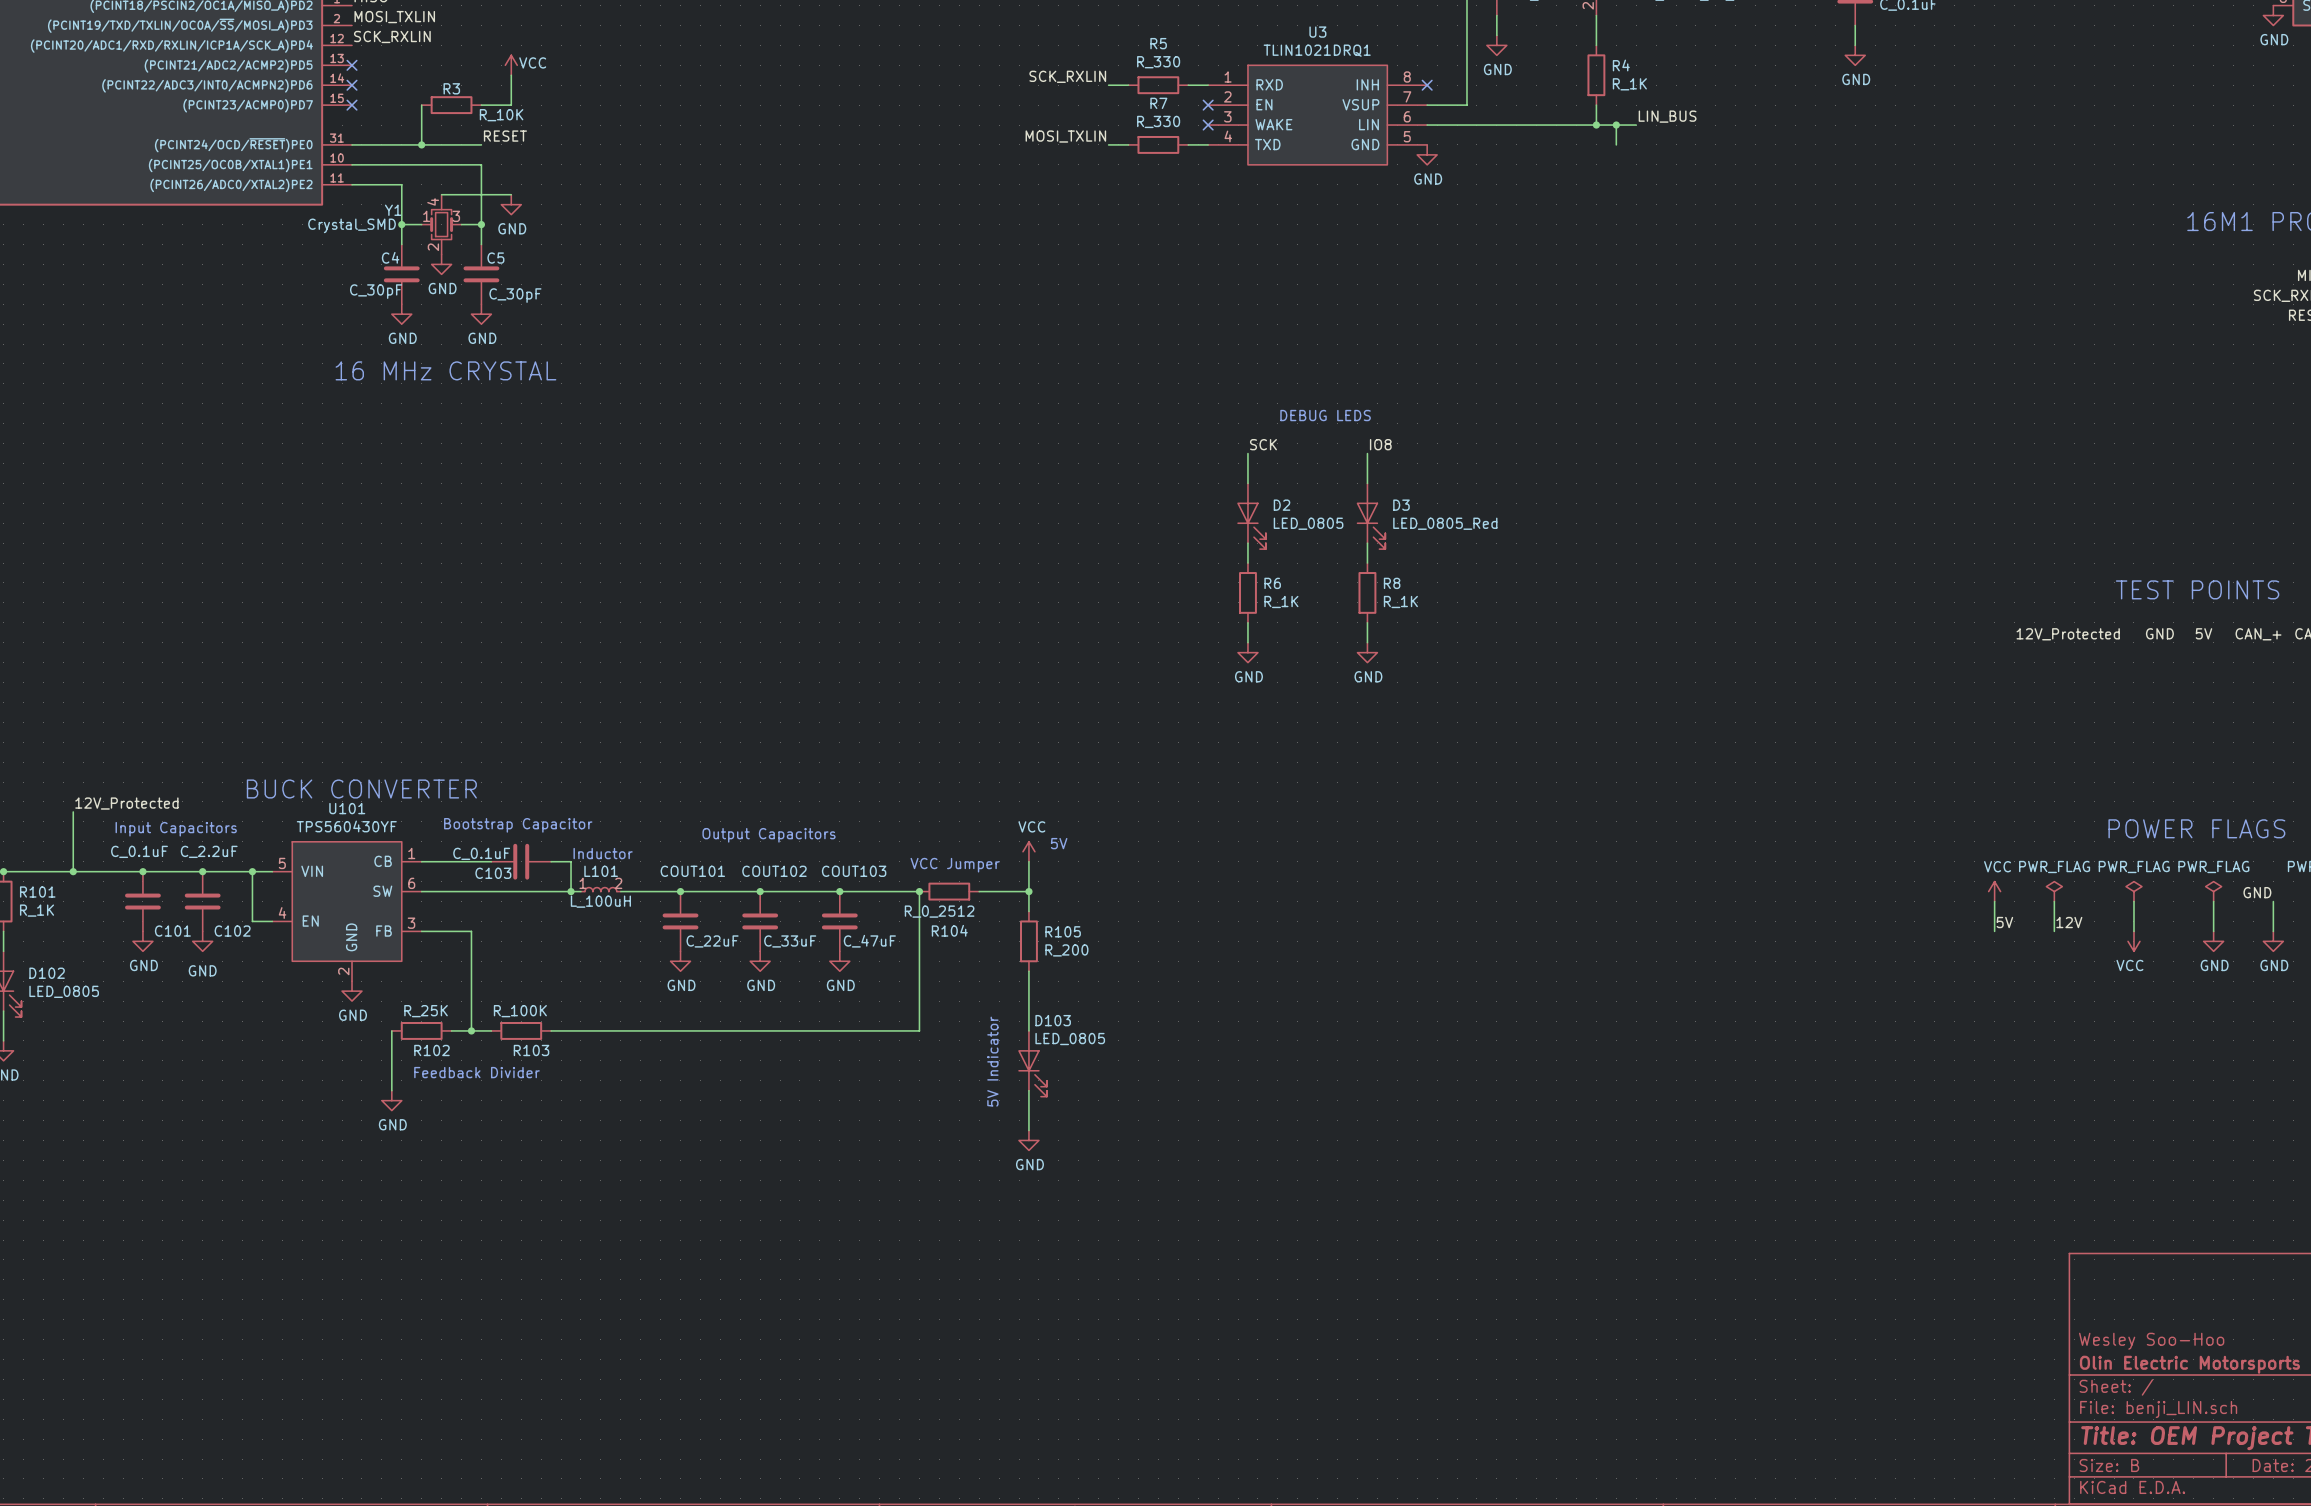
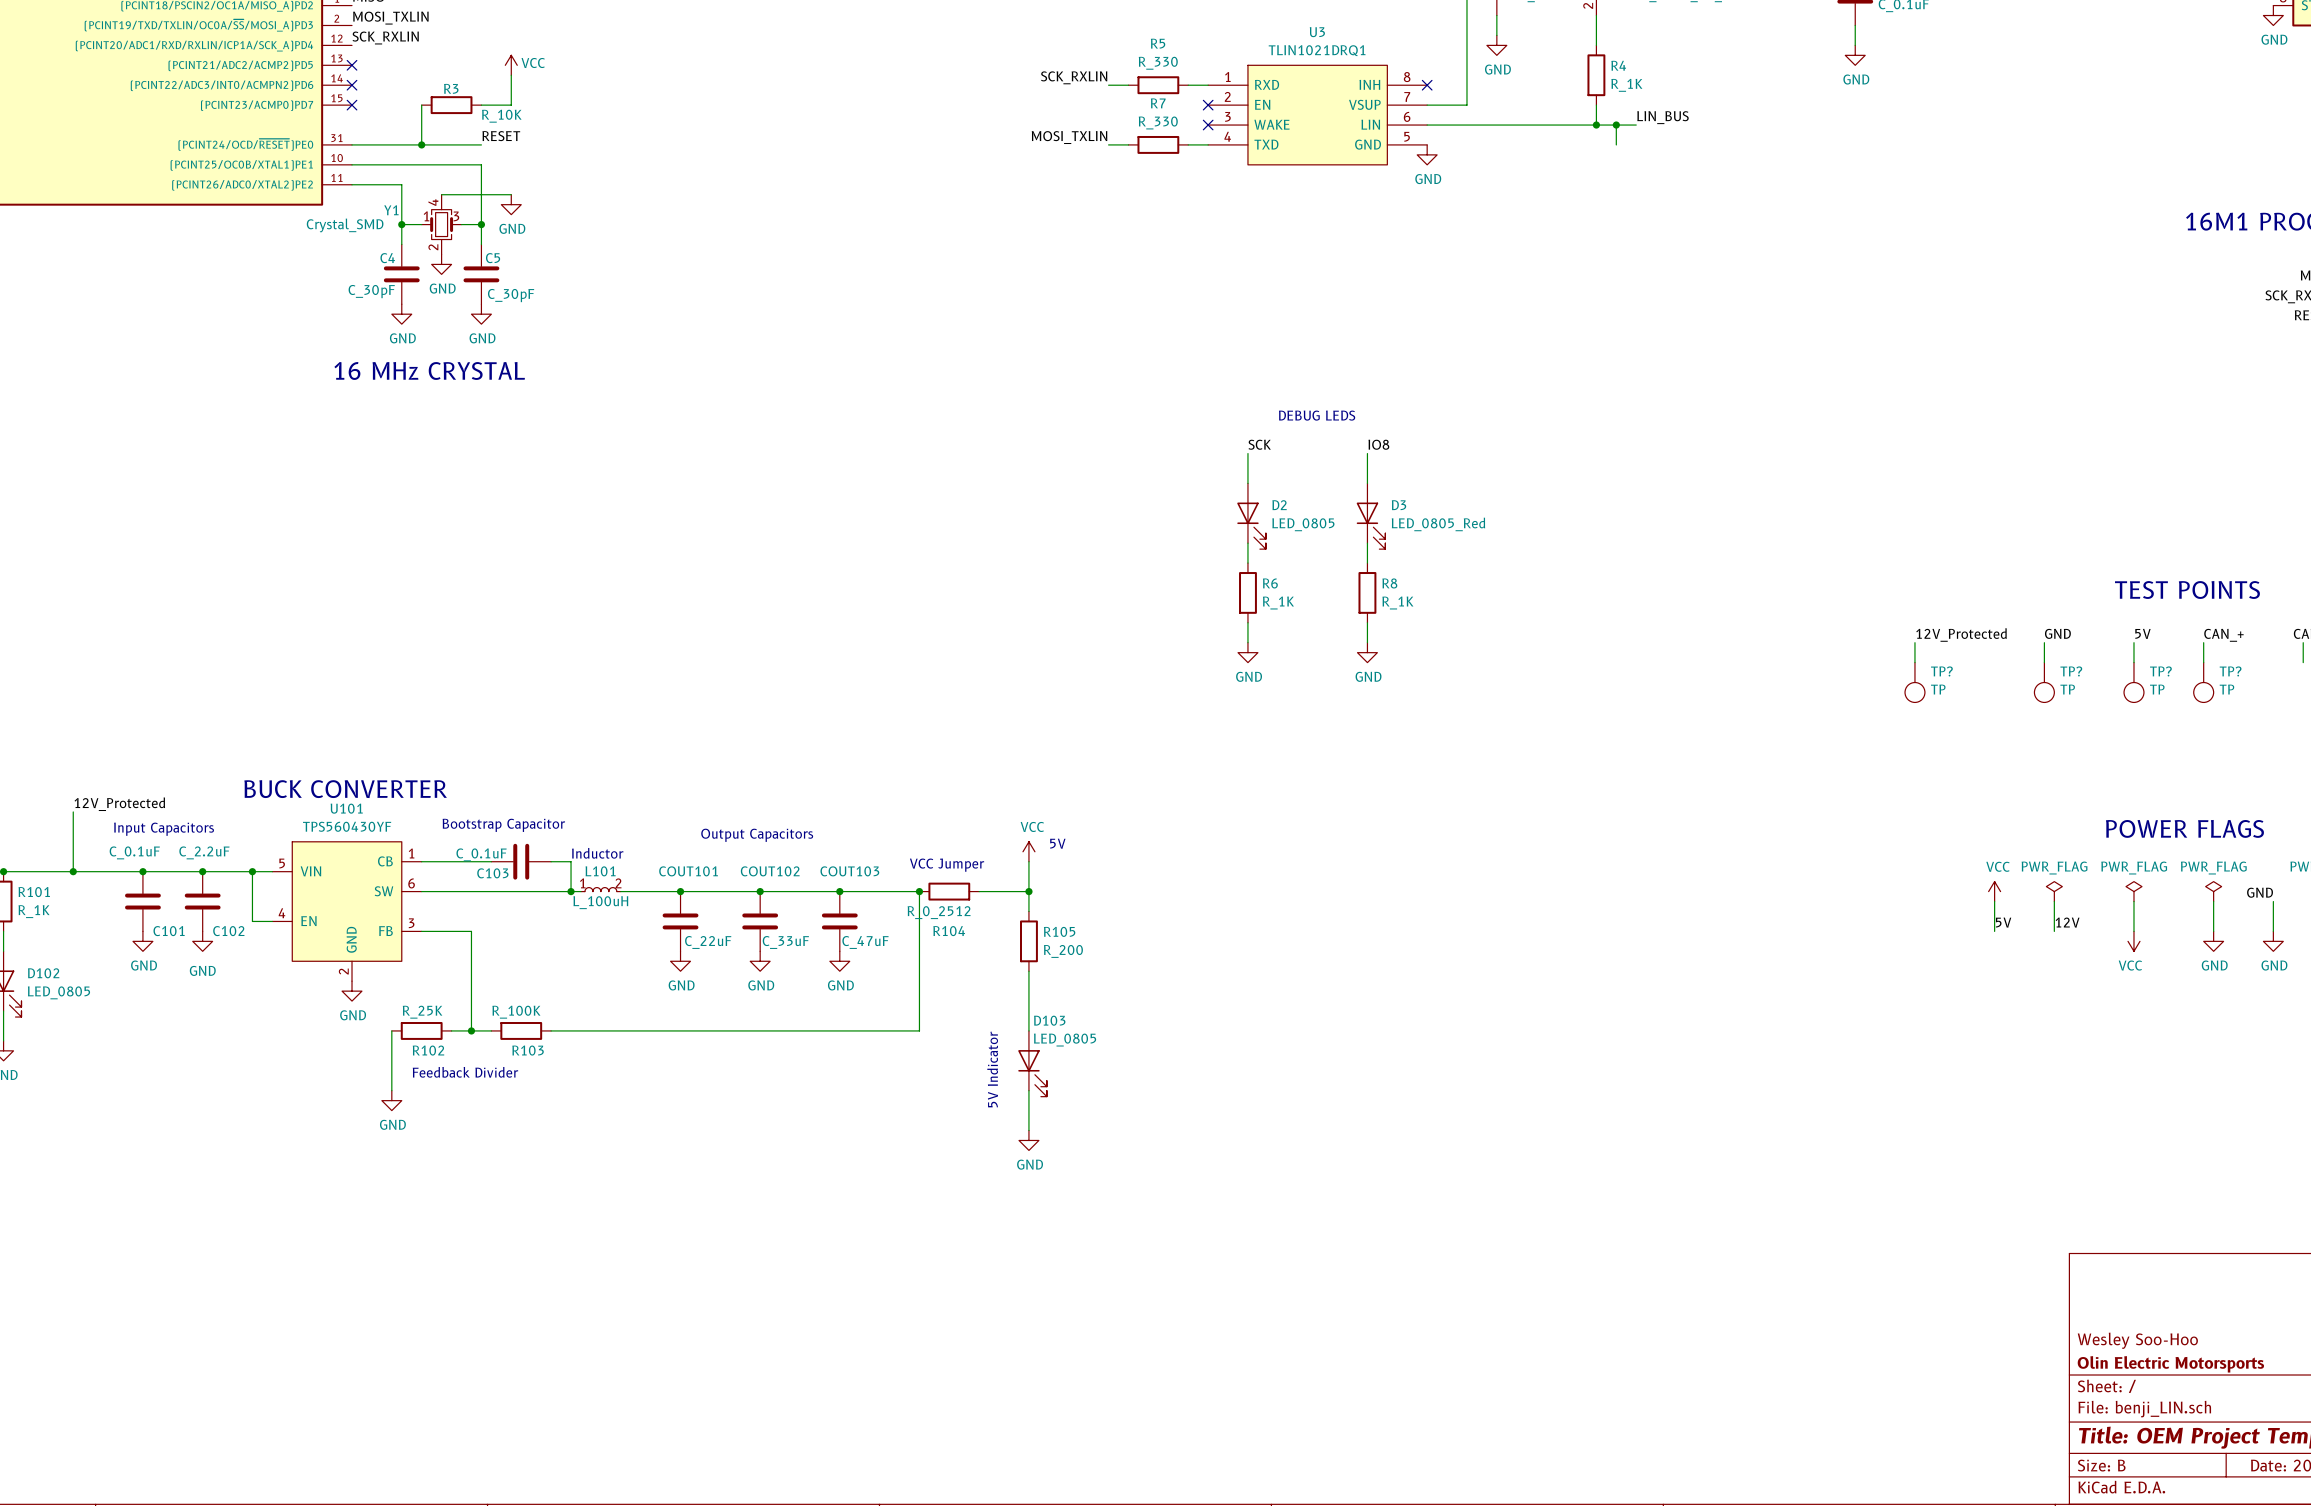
label position: GND (2159, 633) -> GND (2057, 633)
label position: 5V (2203, 633) -> 5V (2142, 633)
label position: 12V_Protected (2068, 634) -> 12V_Protected (1961, 634)
label position: CAN_+ (2258, 634) -> CAN_+ (2223, 635)
wire: none -> (1914, 642) (1914, 662)
wire: none -> (2044, 642) (2044, 662)
wire: none -> (2133, 642) (2133, 662)
wire: none -> (2203, 642) (2203, 662)
wire: none -> (2303, 642) (2303, 662)
TP?: none -> TP (1914, 682)
TP?: none -> TP (2044, 682)
TP?: none -> TP (2133, 682)
TP?: none -> TP (2203, 682)

